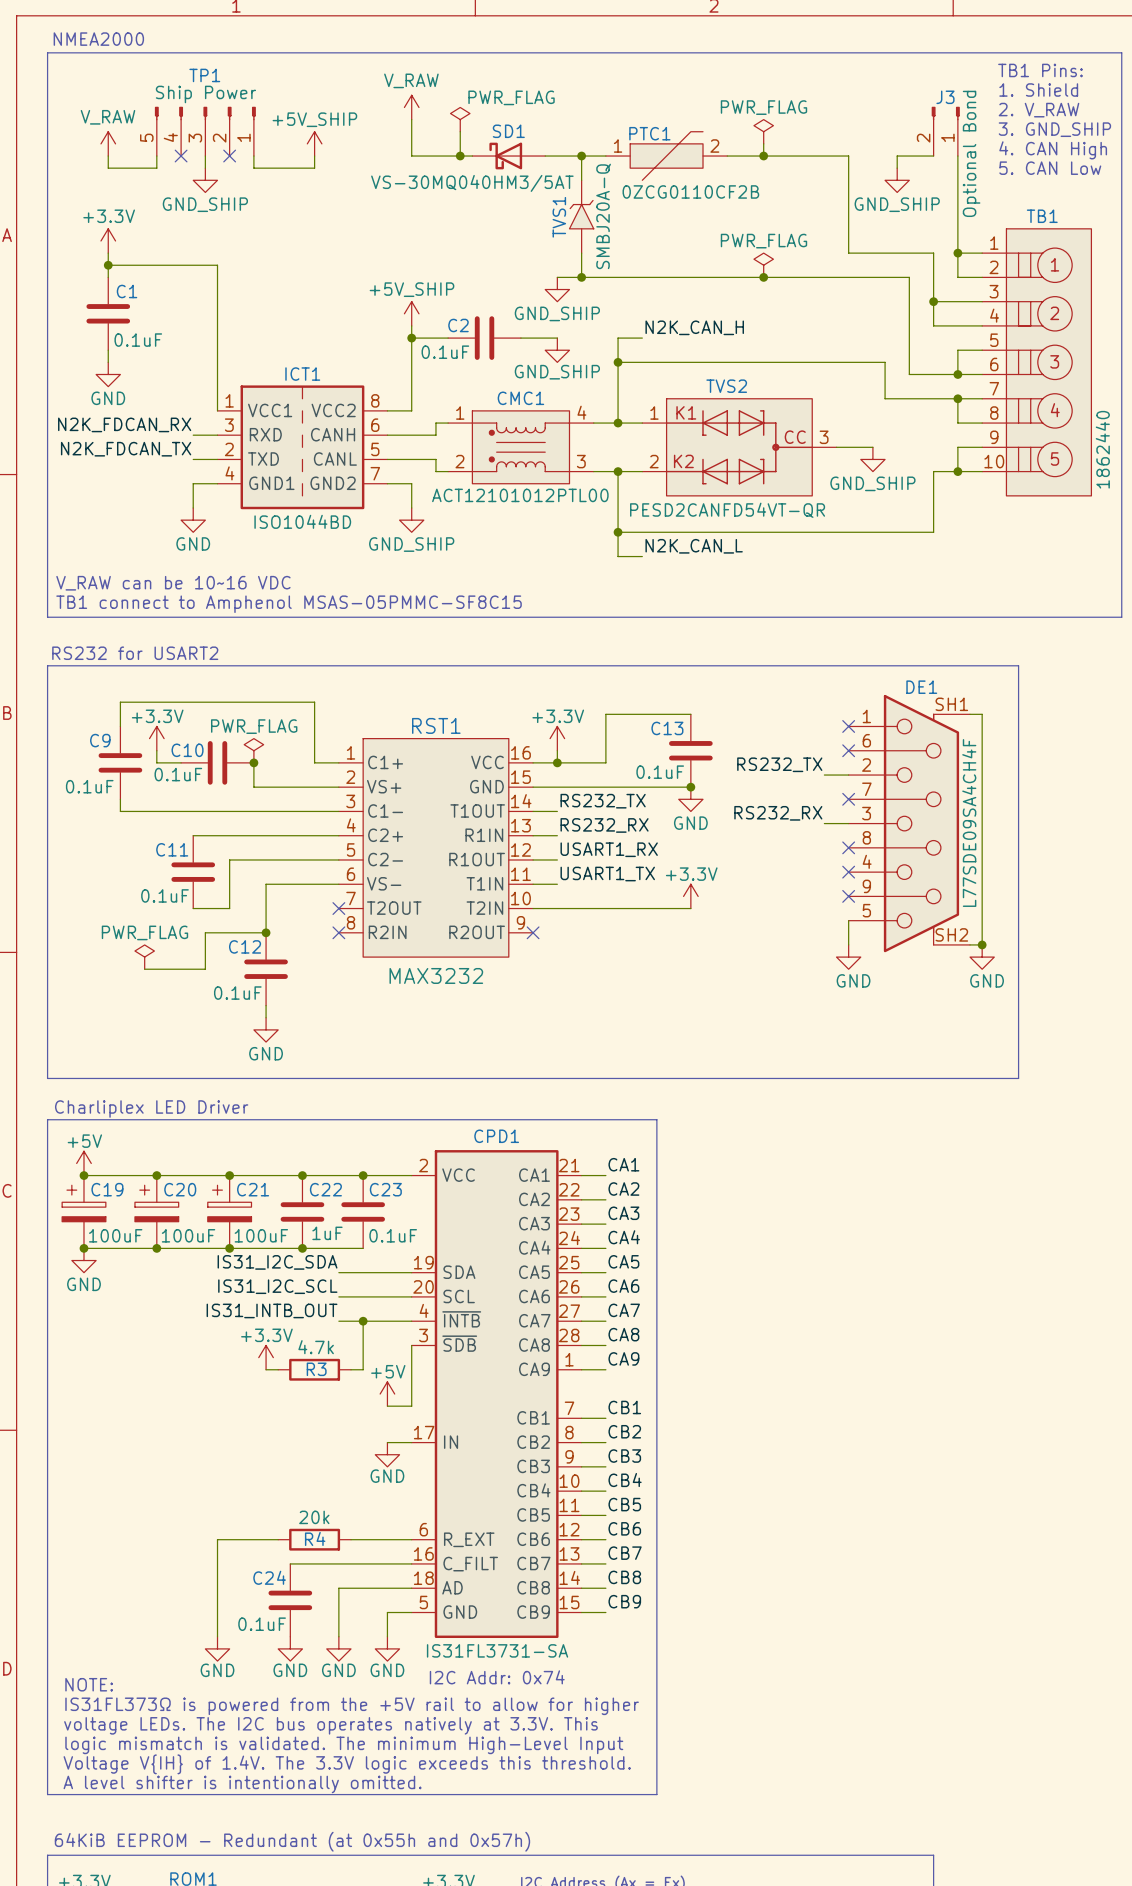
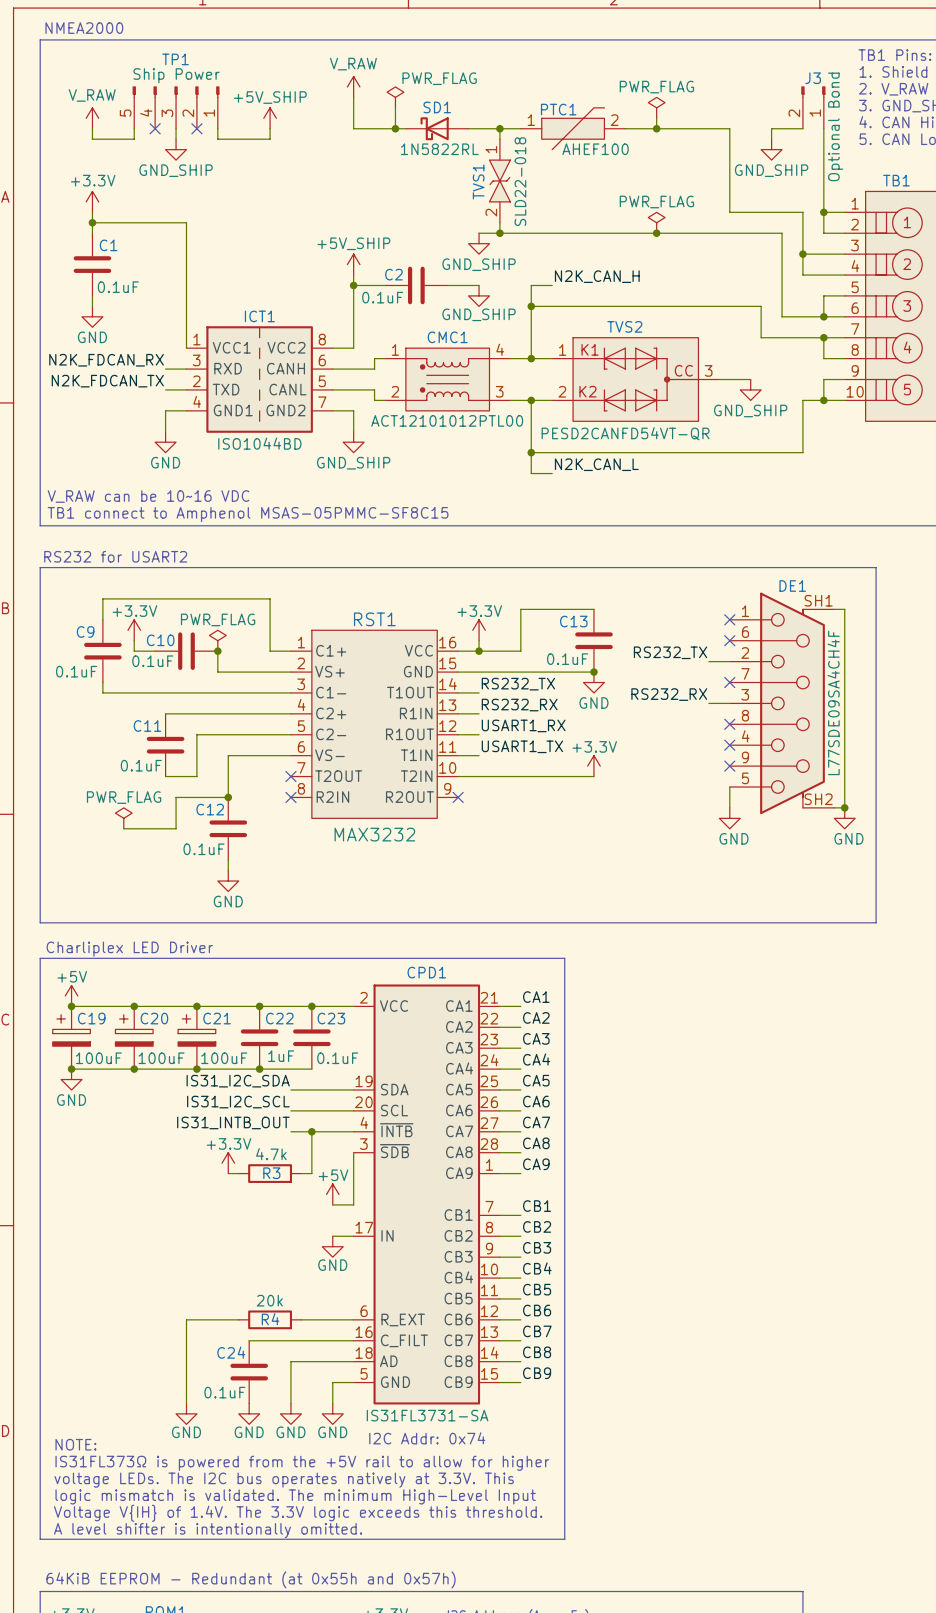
TVS1 symbol: [569, 180, 594, 254] -> [489, 139, 511, 223]
SD1 value: VS-30MQ040HM3/5AT (472, 183) -> 1N5822RL (439, 149)
PTC1 value: 0ZCG0110CF2B (690, 191) -> AHEF100 (595, 149)
TVS1 value: SMBJ20A-Q (603, 216) -> SLD22-018 (520, 181)

